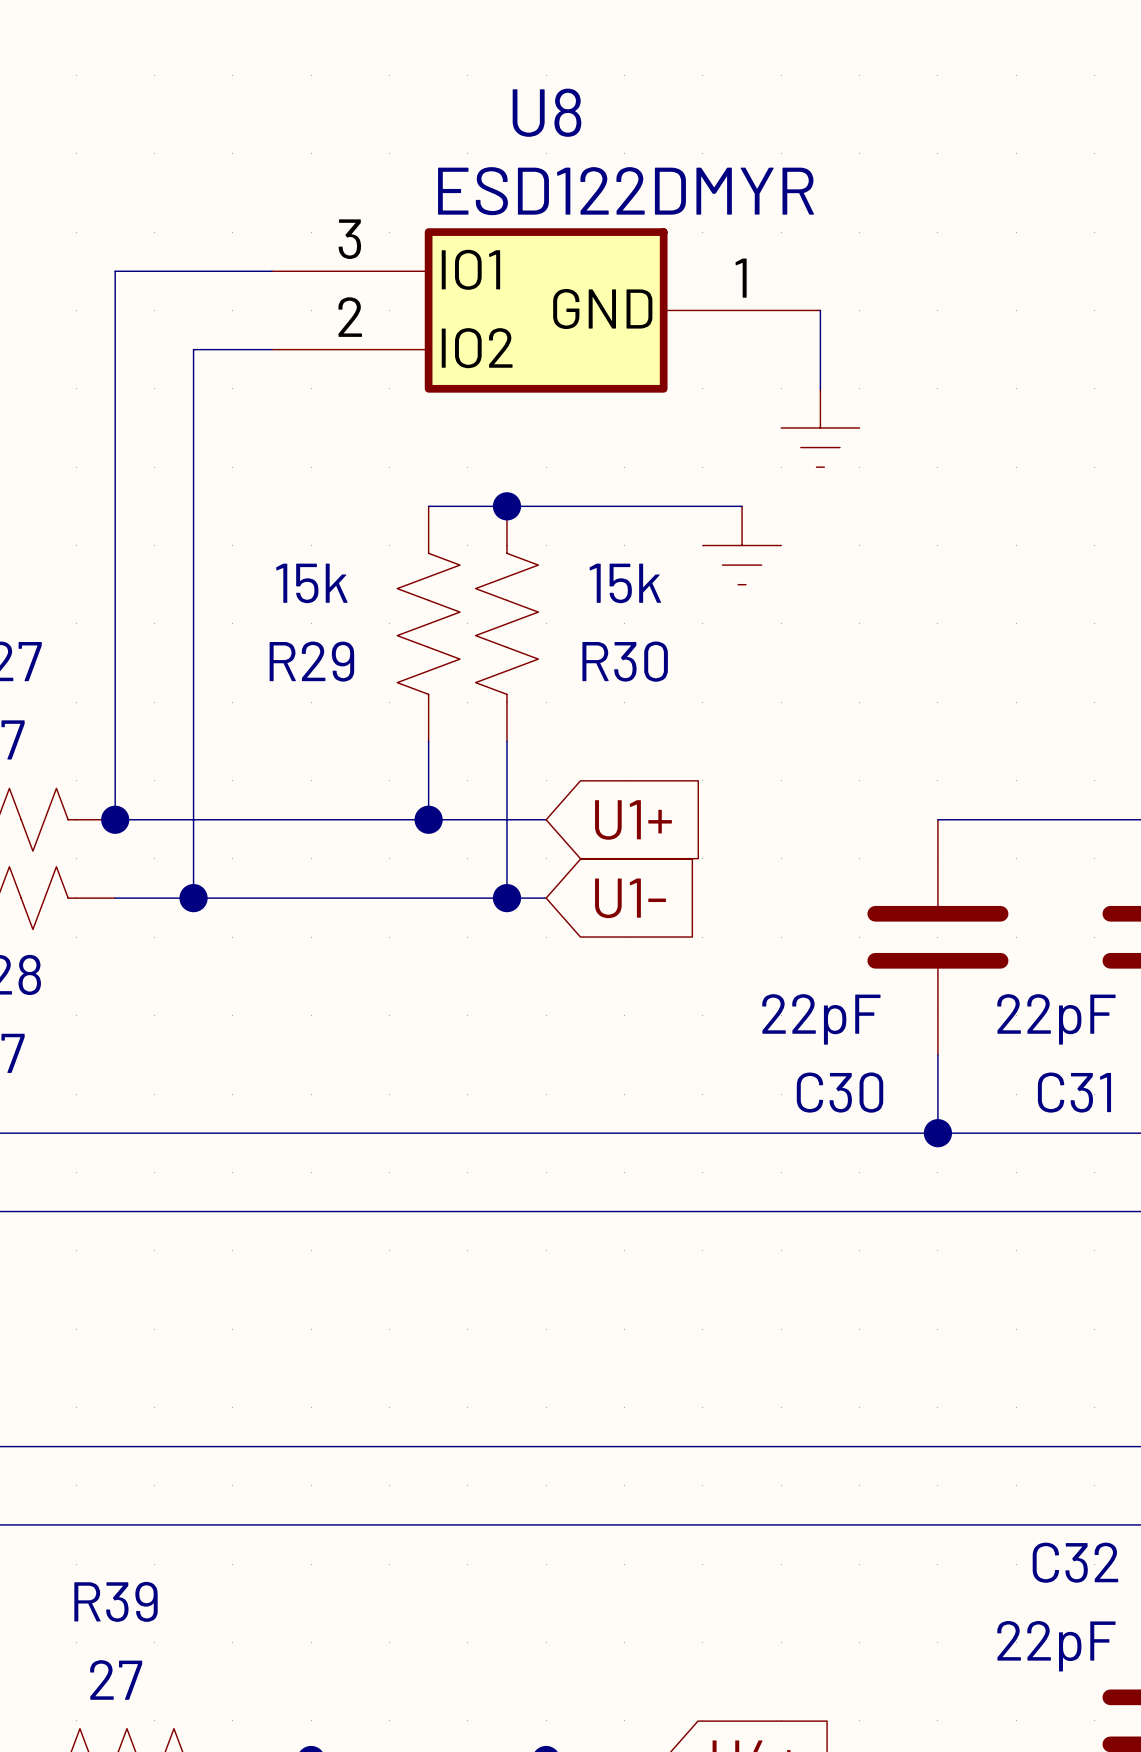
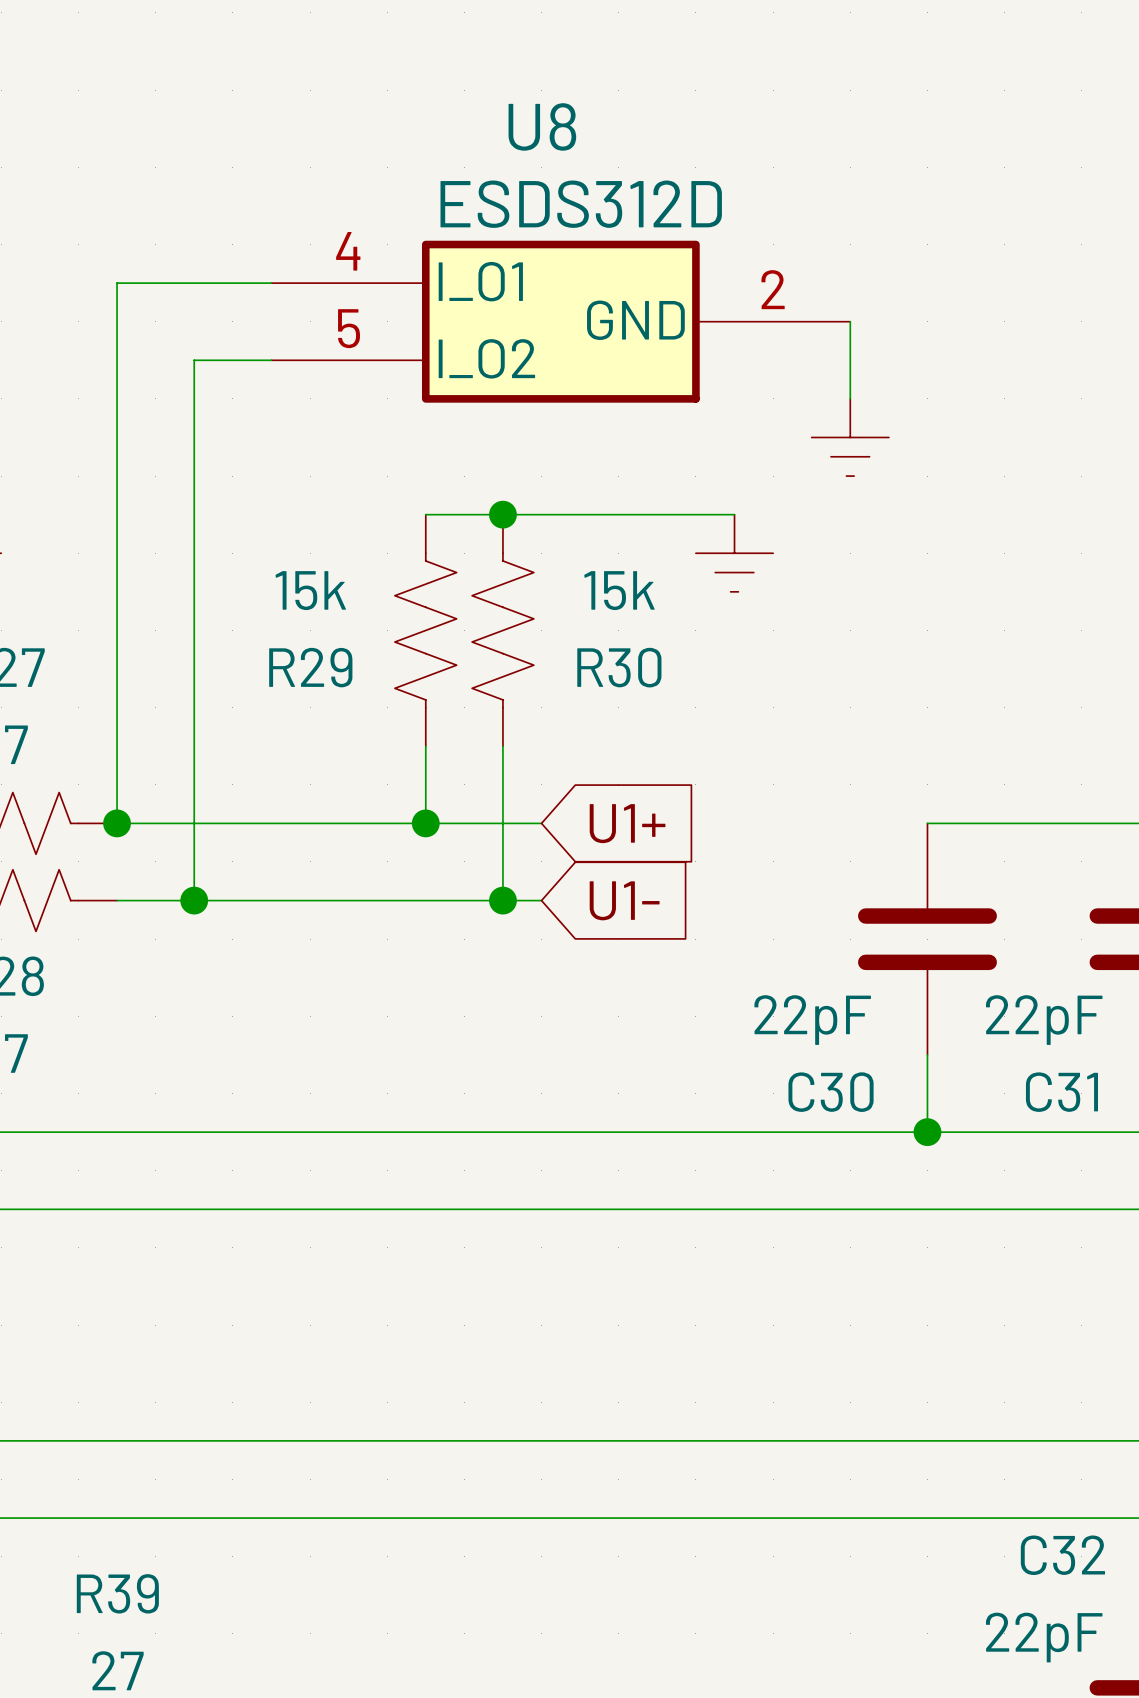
U8 value: ESD122DMYR (626, 191) -> ESDS312D (581, 204)
U8 symbol: [271, 228, 821, 393] -> [271, 240, 851, 403]
wire: (820, 310) (820, 388) -> (850, 321) (850, 398)
power symbol position: (820, 427) -> (850, 437)

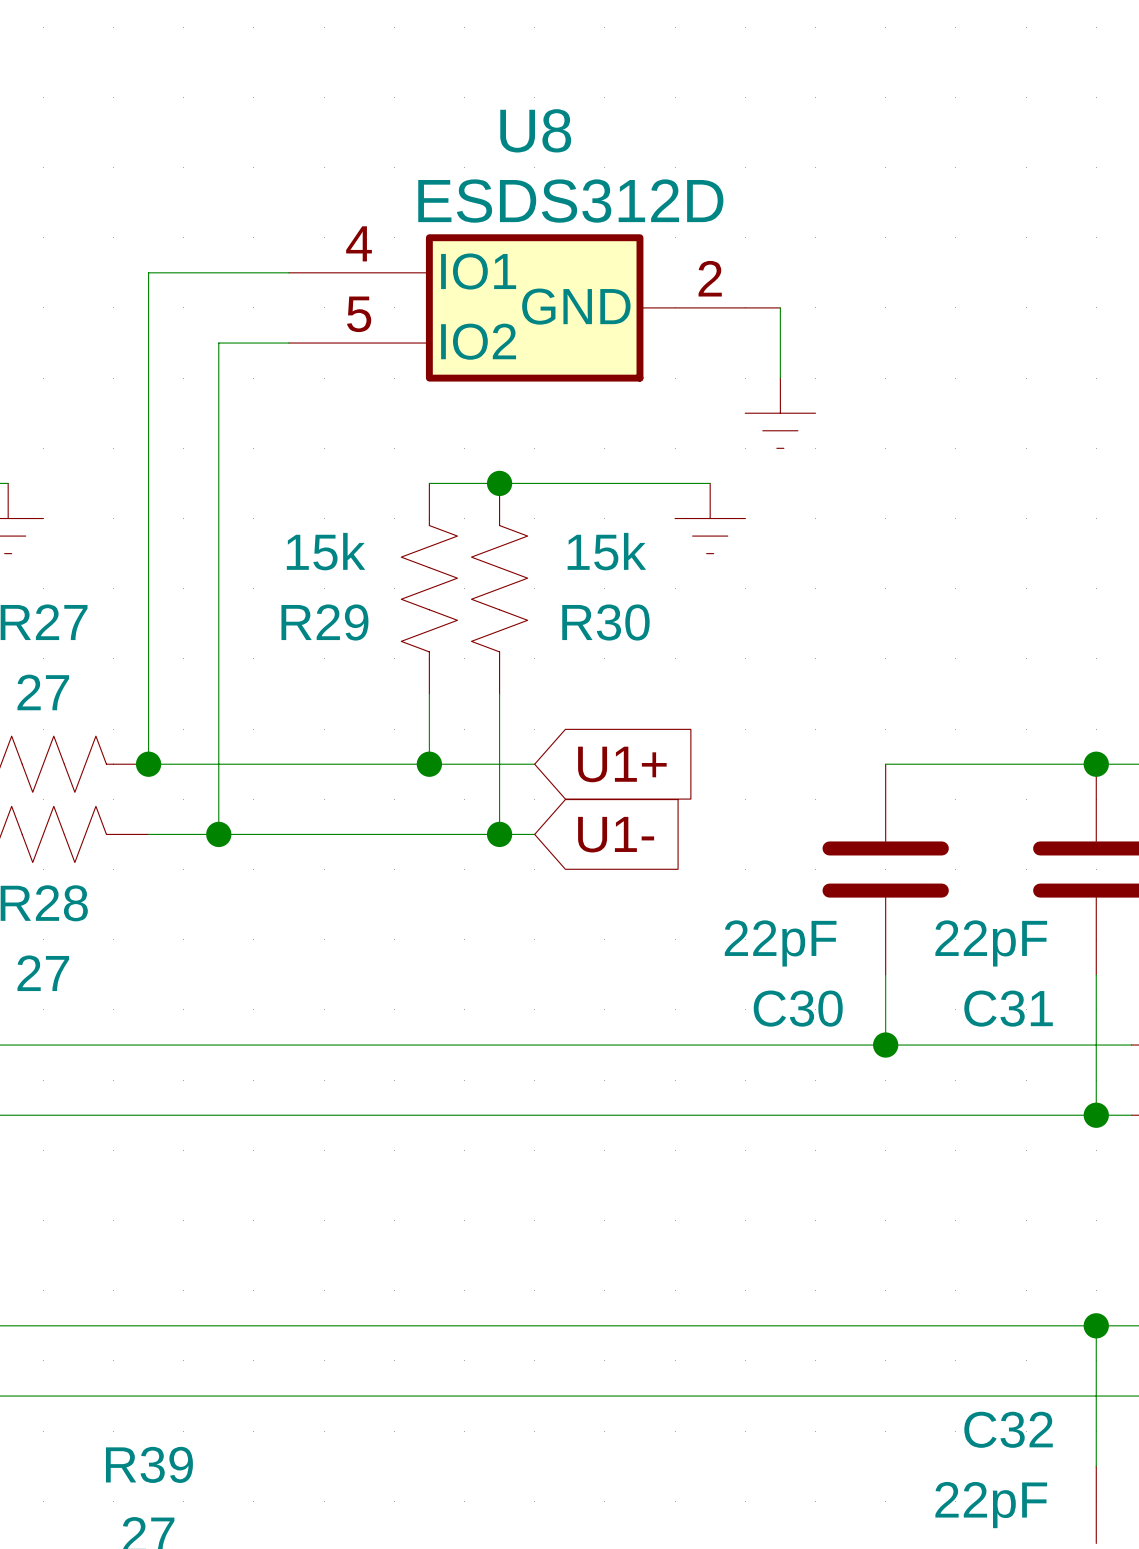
U8 symbol: [271, 240, 851, 403] -> [288, 234, 781, 382]
wire: (850, 321) (850, 398) -> (780, 307) (780, 378)
power symbol position: (850, 437) -> (780, 413)

